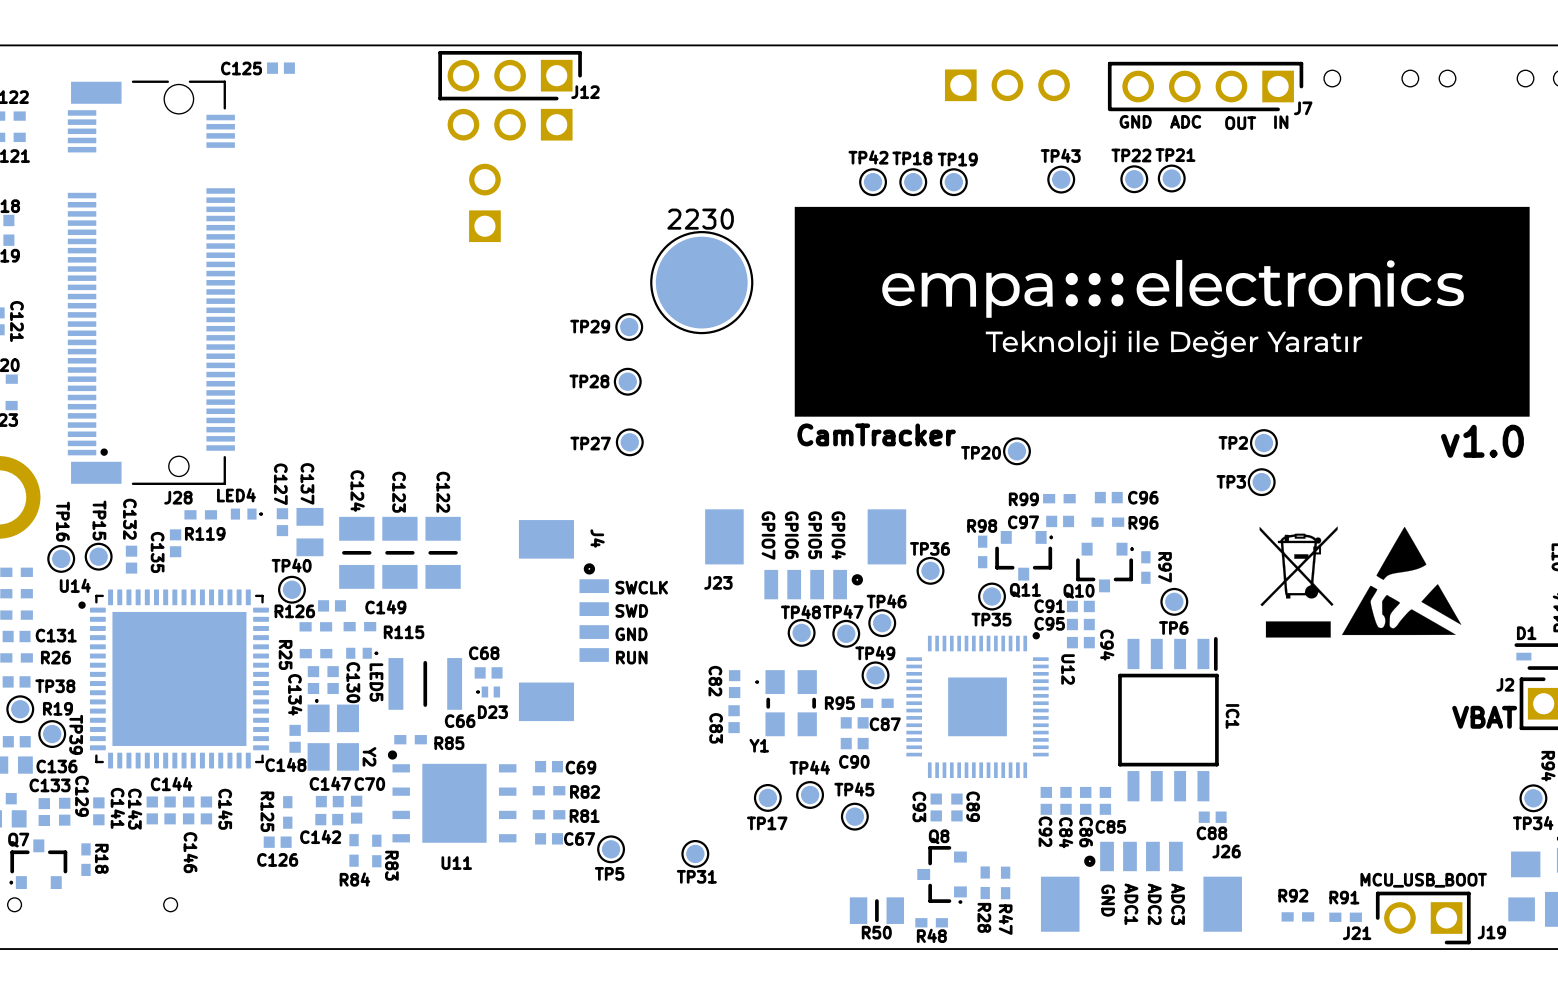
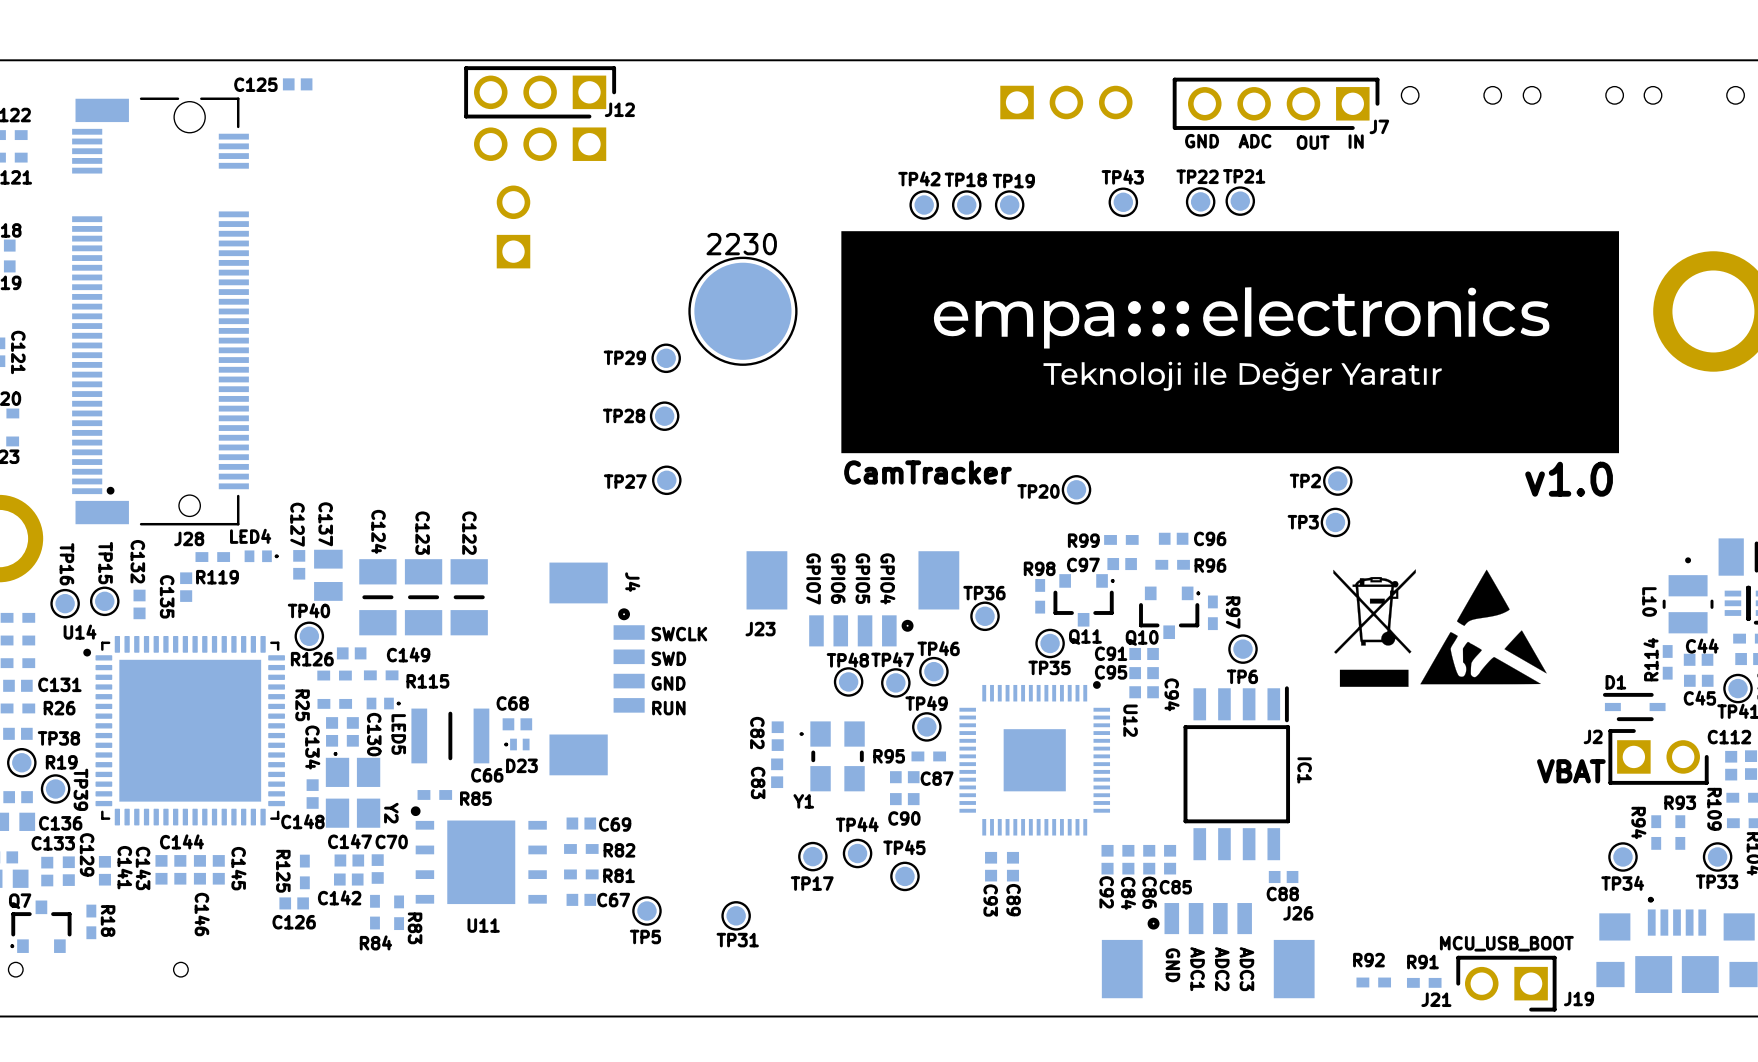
C93 name position: C93 (919, 806) -> C93 (990, 900)
C89 name position: C89 (973, 806) -> C89 (1013, 900)
Q8: (942, 874) -> none
R28: (985, 882) -> none
R47: (1005, 882) -> none
R50: (876, 910) -> none
R48: (931, 922) -> none

